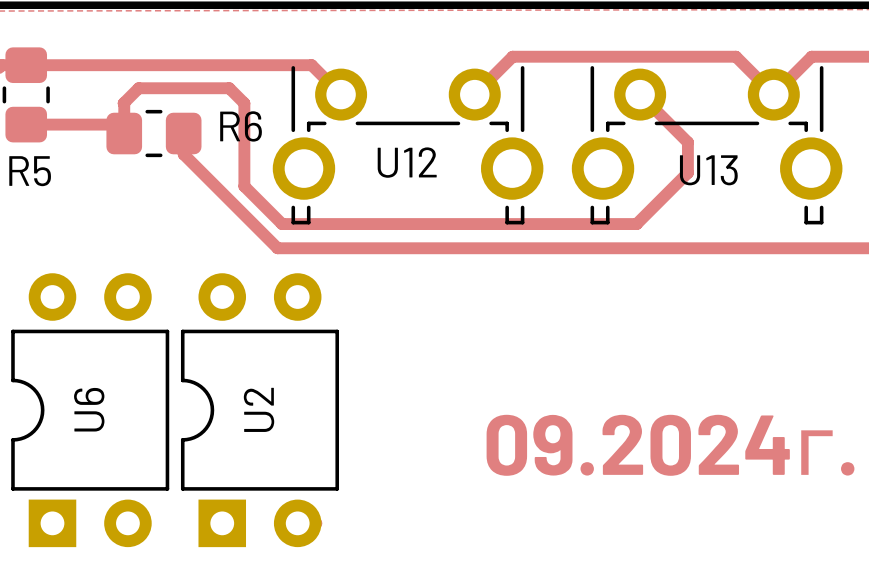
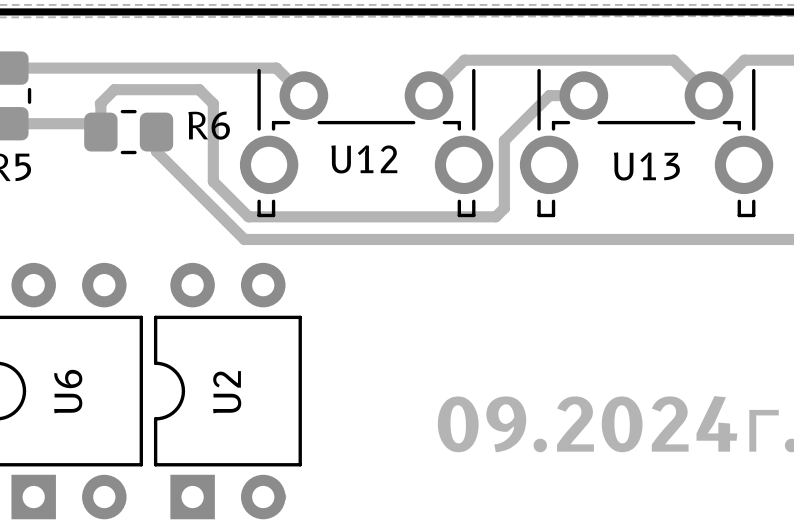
track: (640, 94) (687, 142) (687, 172) (636, 224) (546, 224) -> (583, 95) (549, 95) (504, 140) (504, 208) (495, 216)

